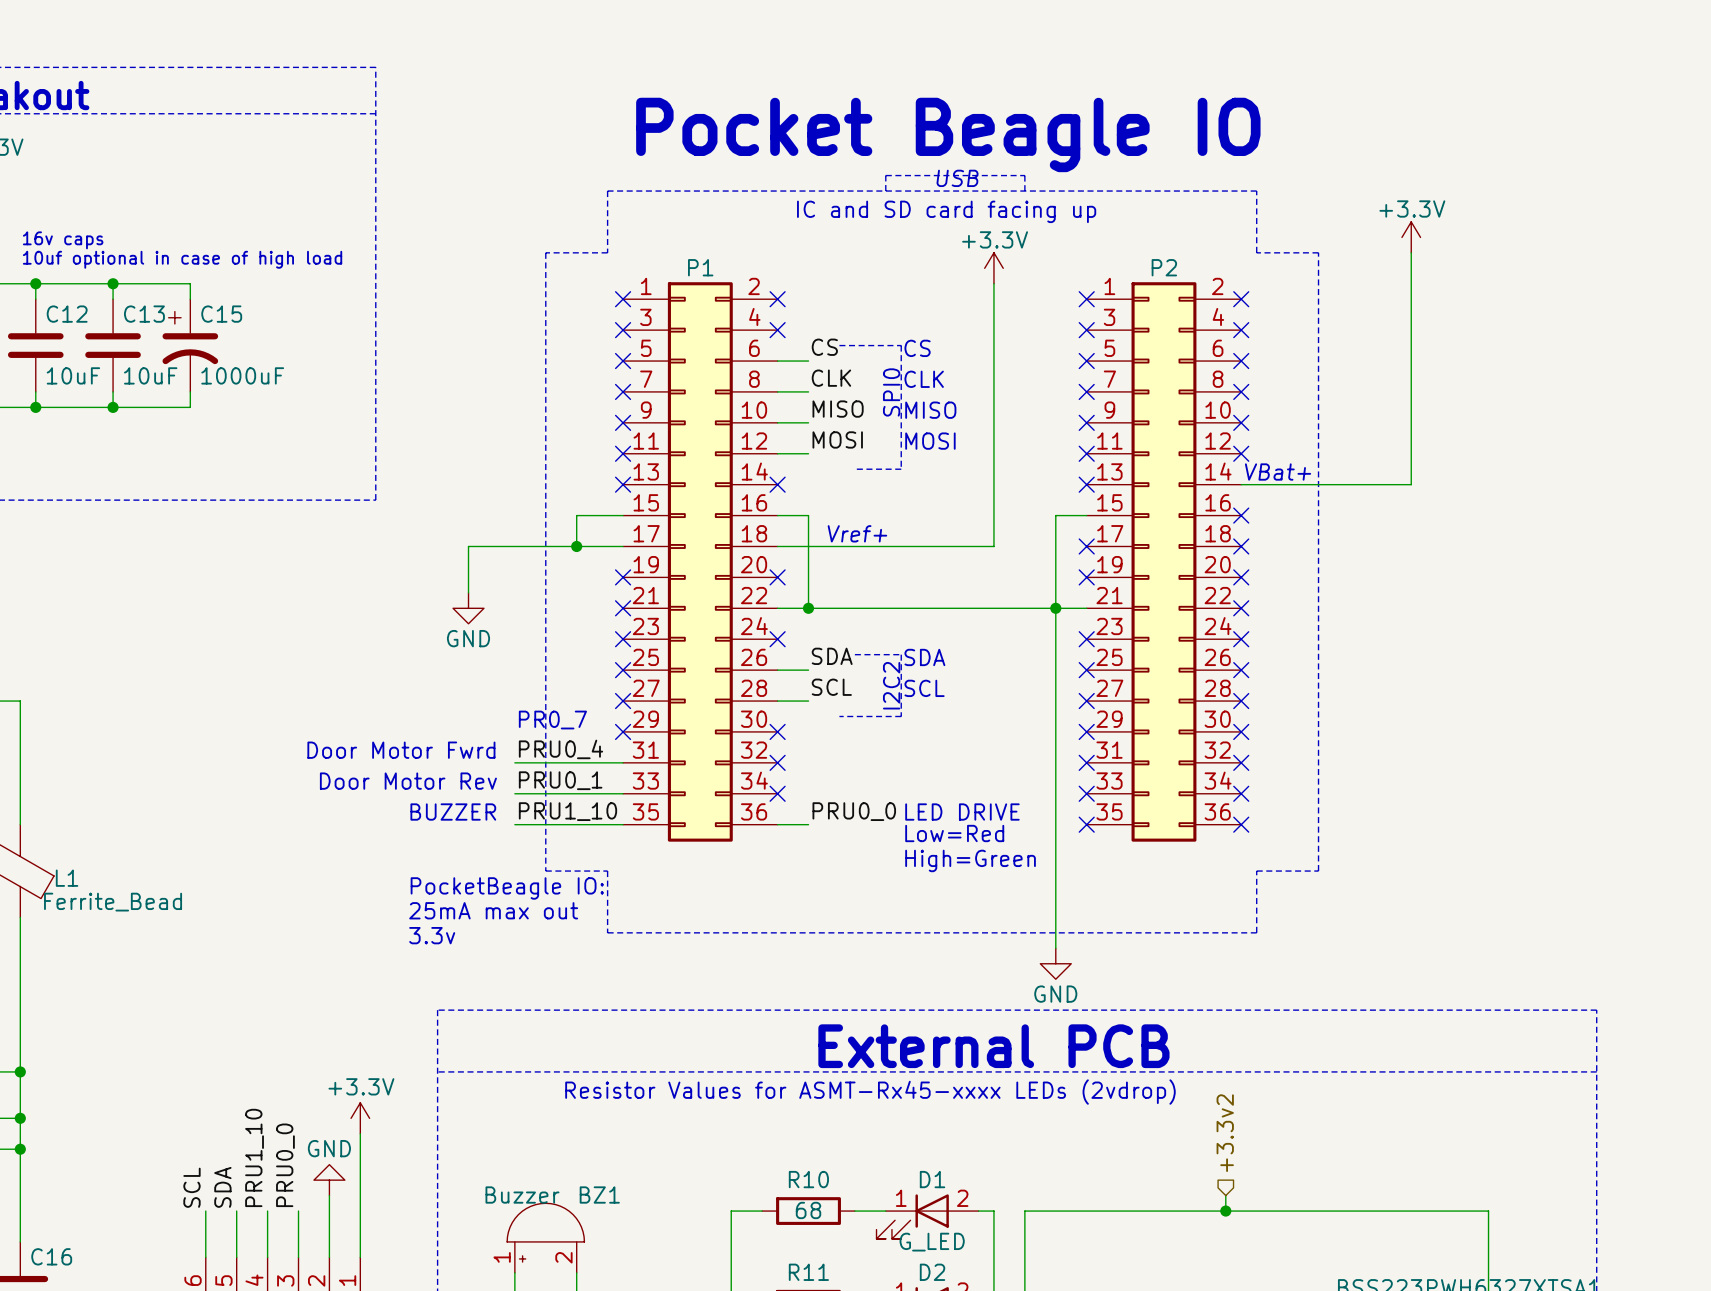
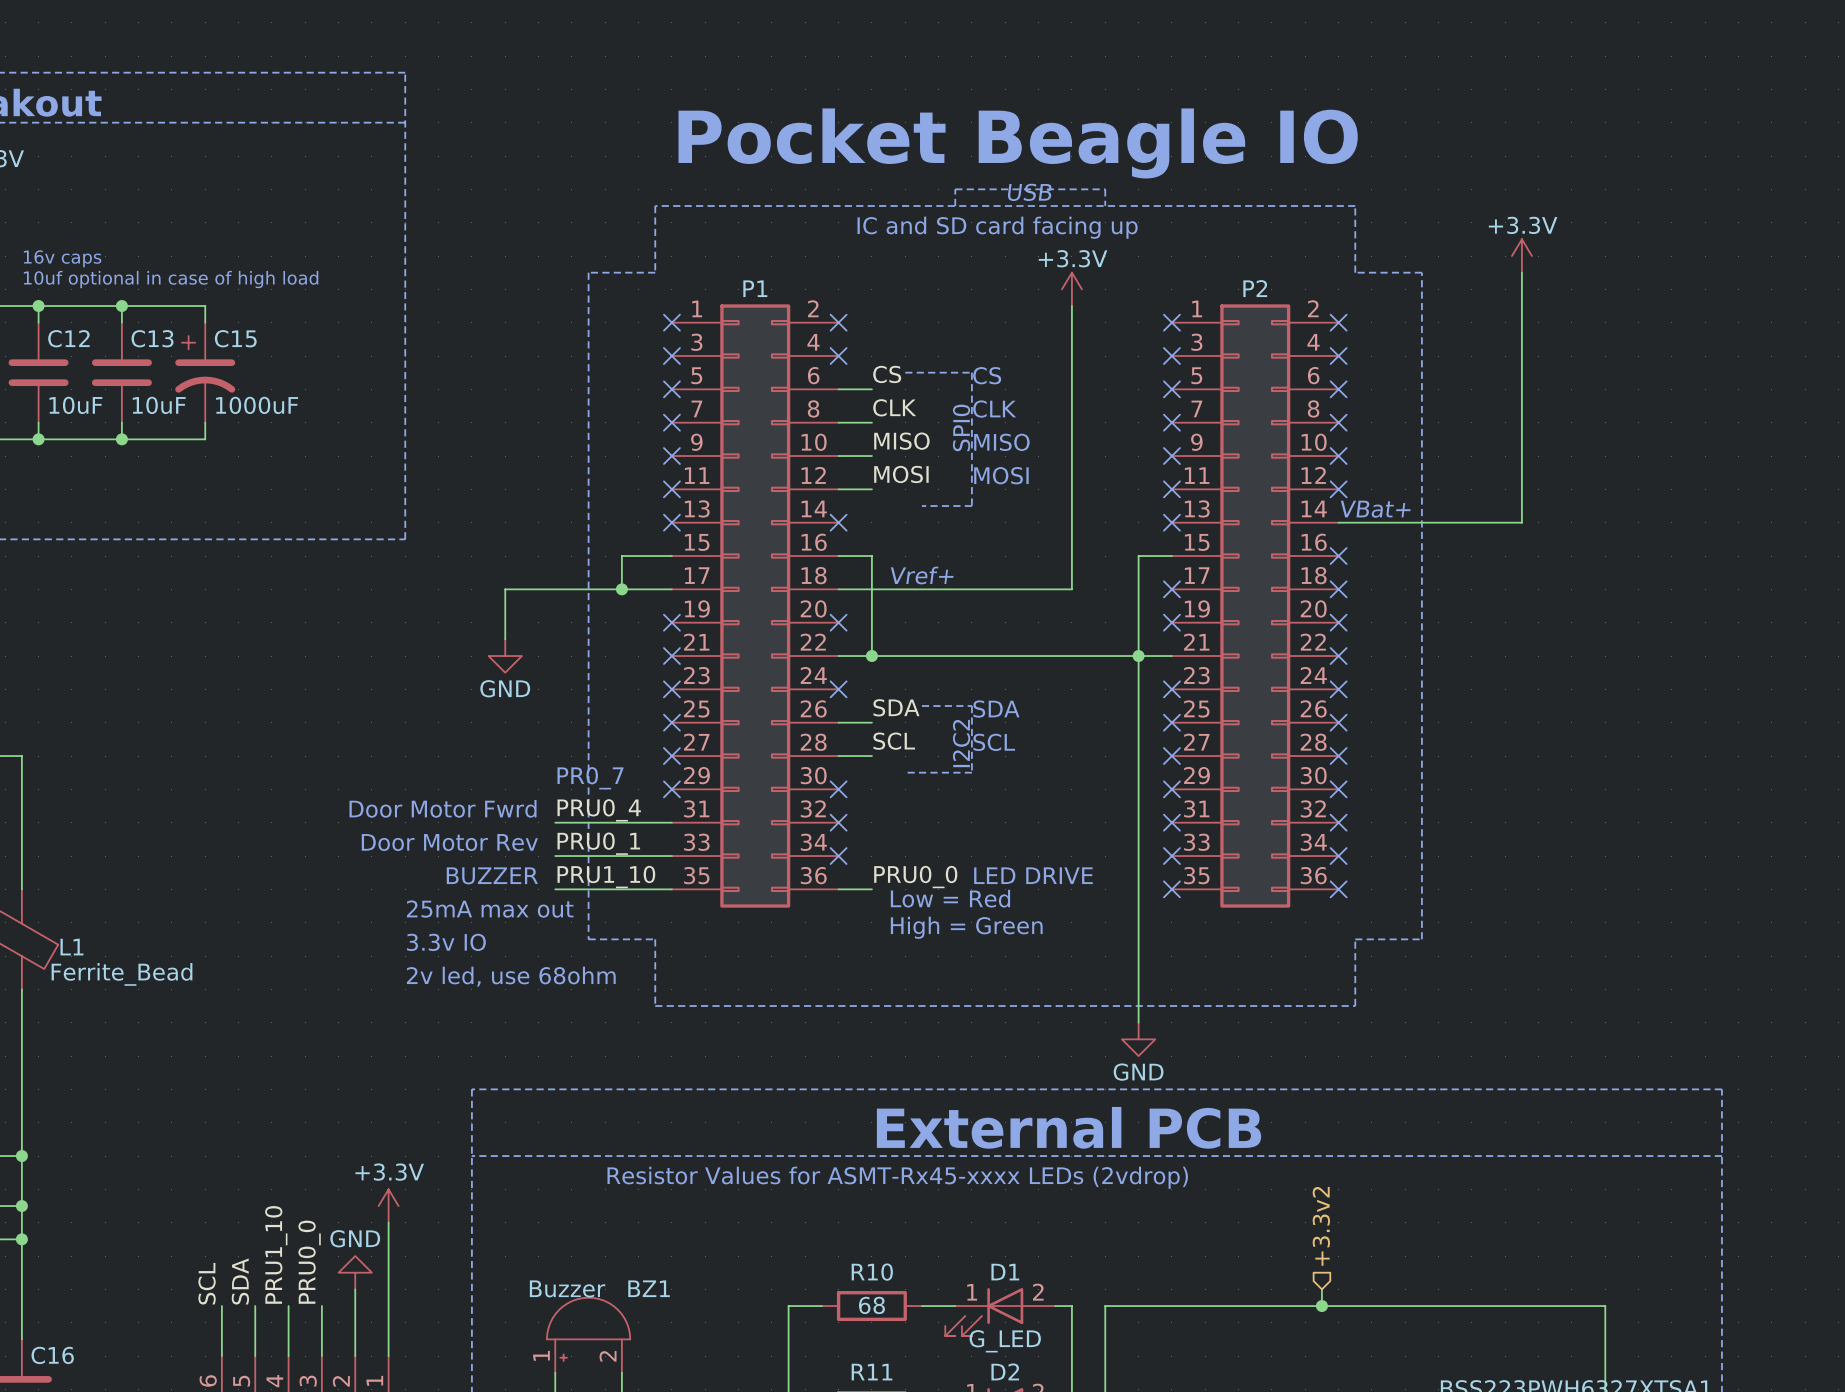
text: Low=Red (954, 833) -> Low = Red (950, 898)
text: High=Green (970, 860) -> High = Green (966, 927)
text: none -> 3.3v IO (446, 942)
text: PocketBeagle IO: (507, 888) -> none
text: none -> 2v led, use 68ohm (511, 976)
text position: 25mA max out (493, 910) -> 25mA max out (490, 909)
text: 3.3v (432, 935) -> none

